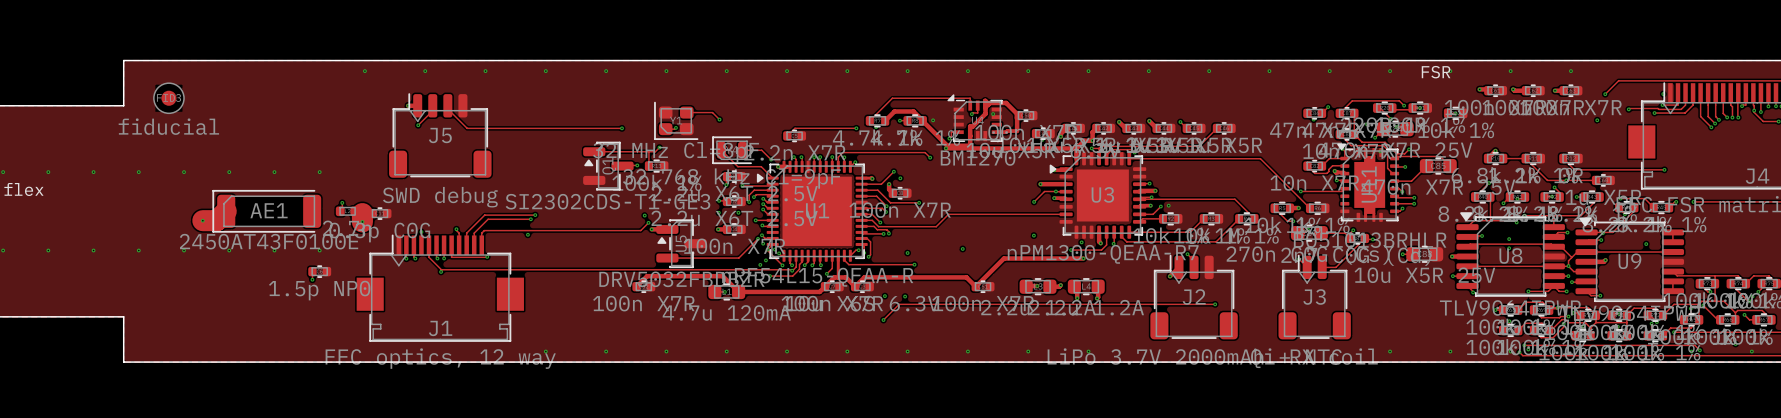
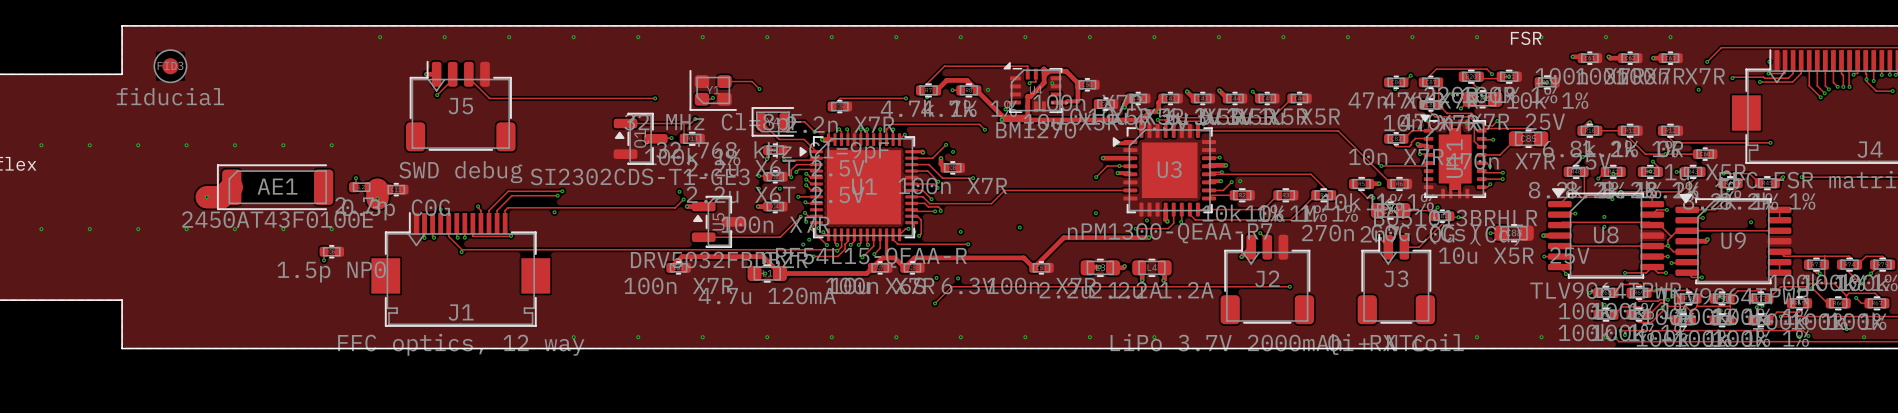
track: none -> (873, 234) (873, 246) (862, 257)
via: none -> (862, 257)

